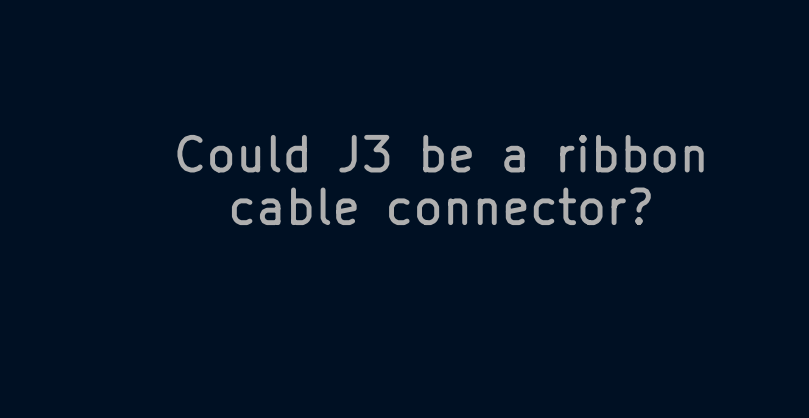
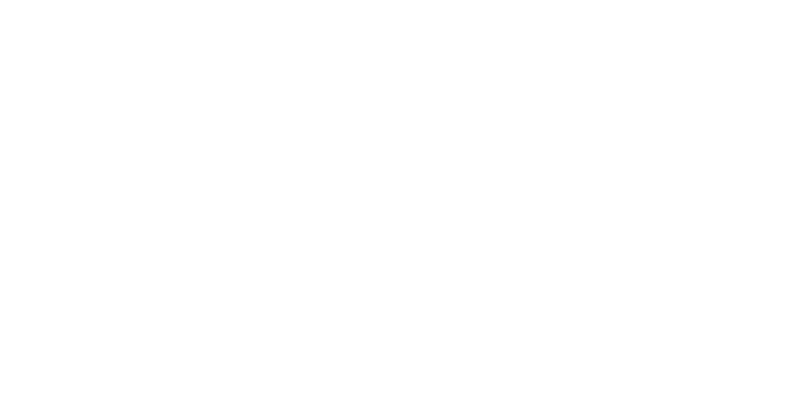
text: Could J3 be a ribbon (440, 153) -> none
text: cable connector? (441, 206) -> none

